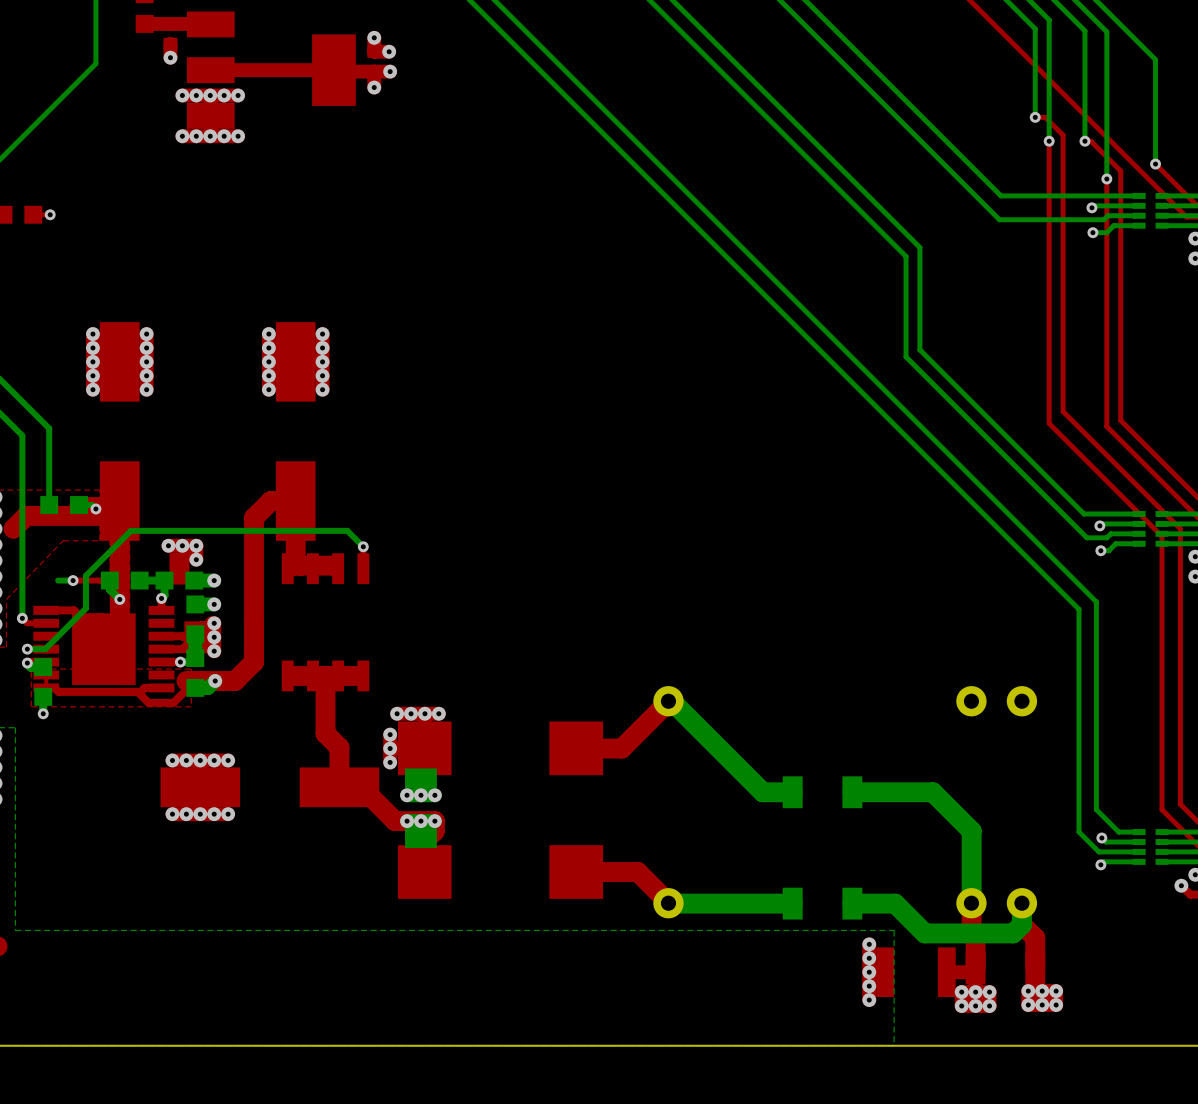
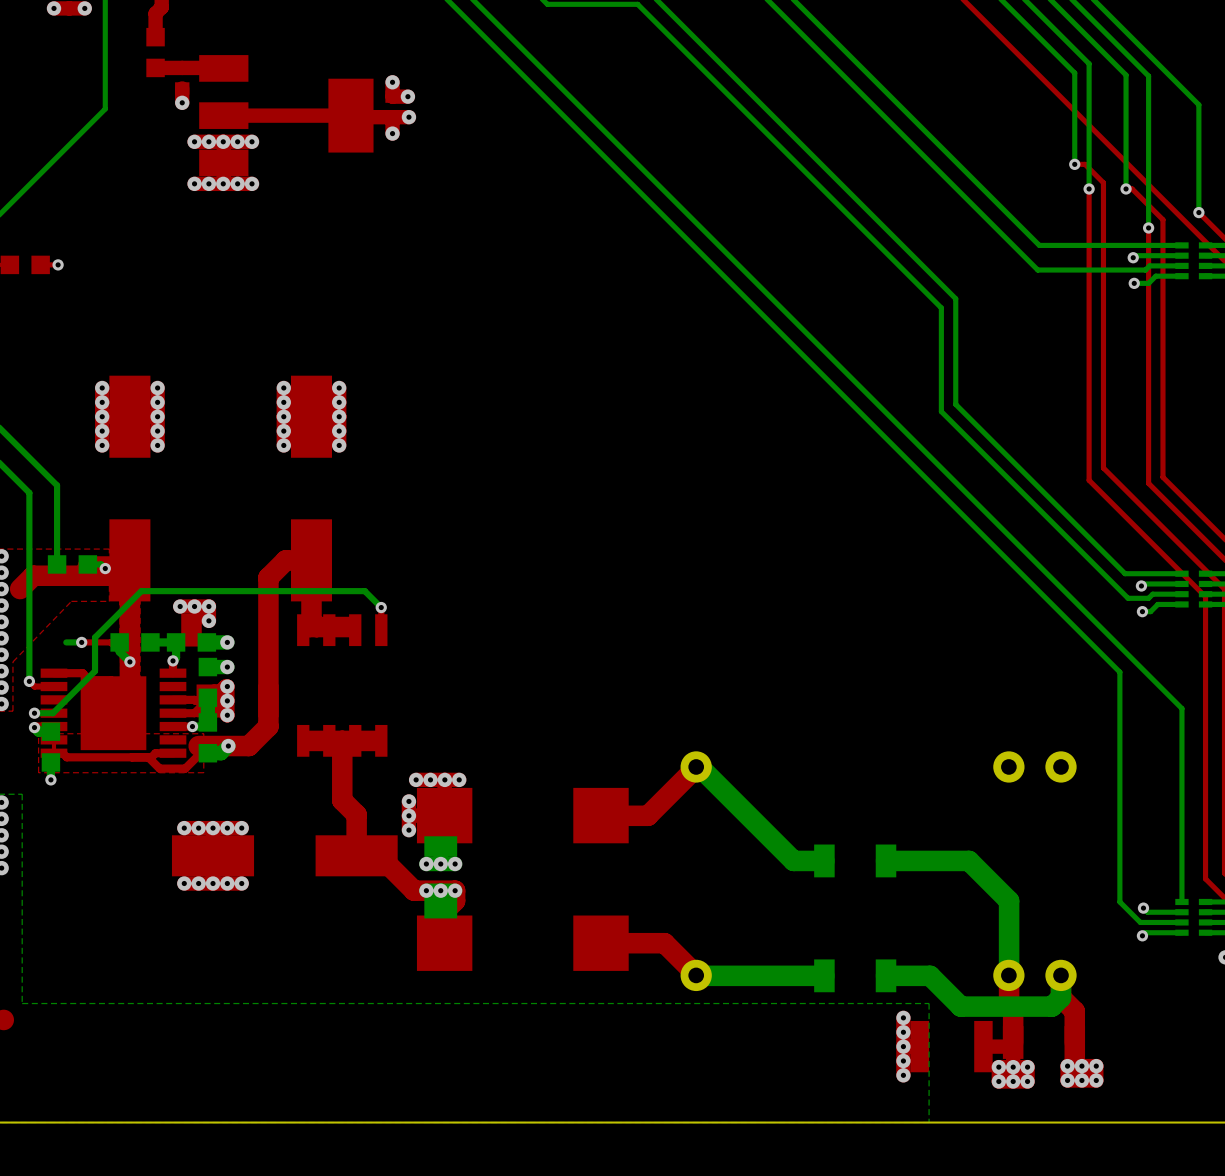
bottom track: (1096, 601) (1096, 809) (1118, 832) (1139, 832) -> (1137, 664) (1181, 708) (1181, 901)

